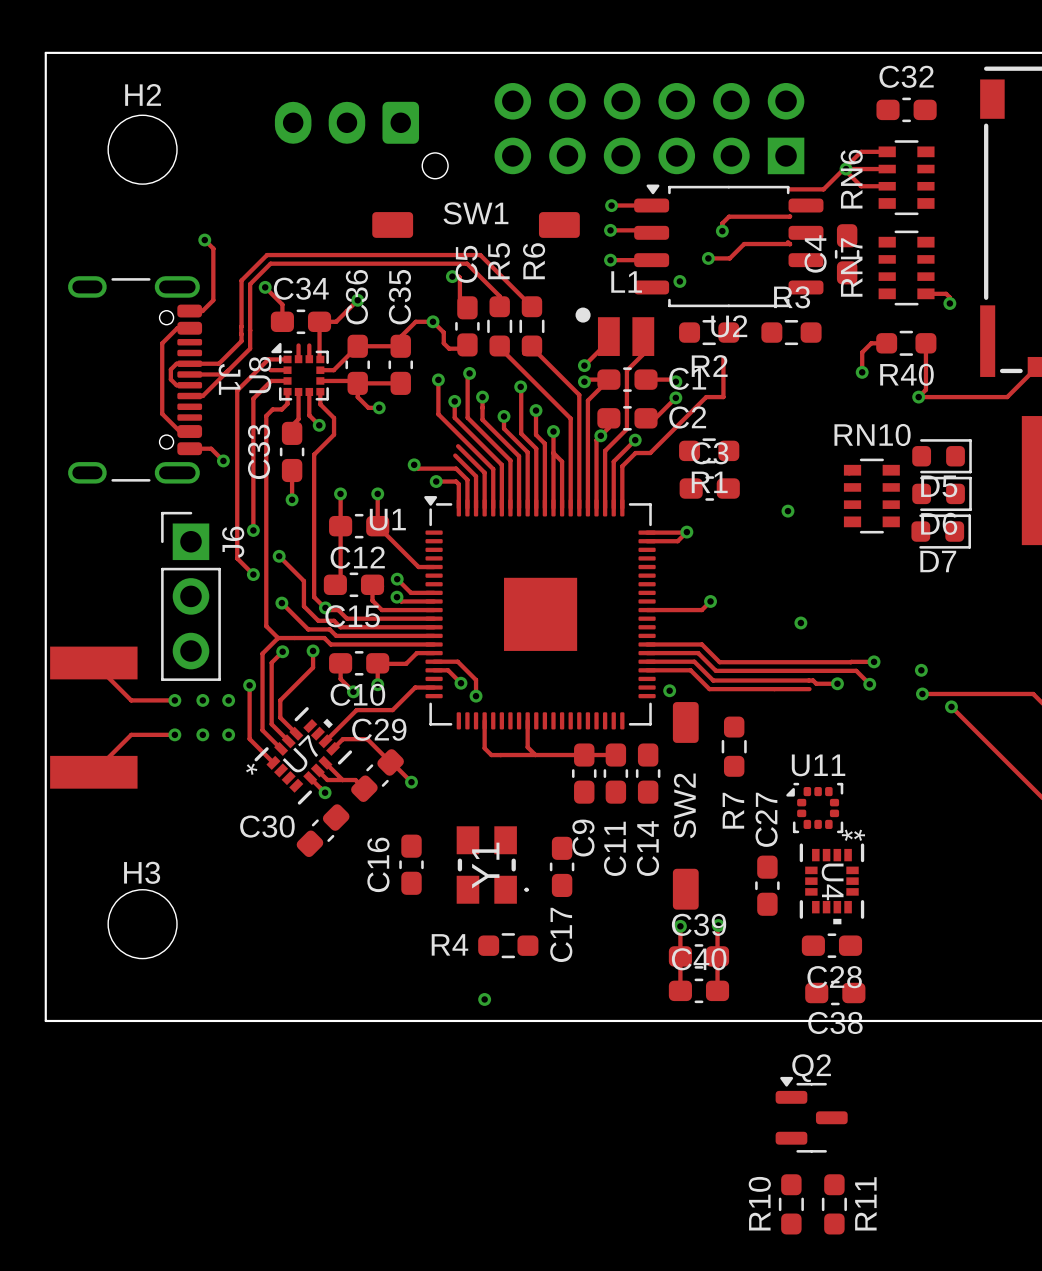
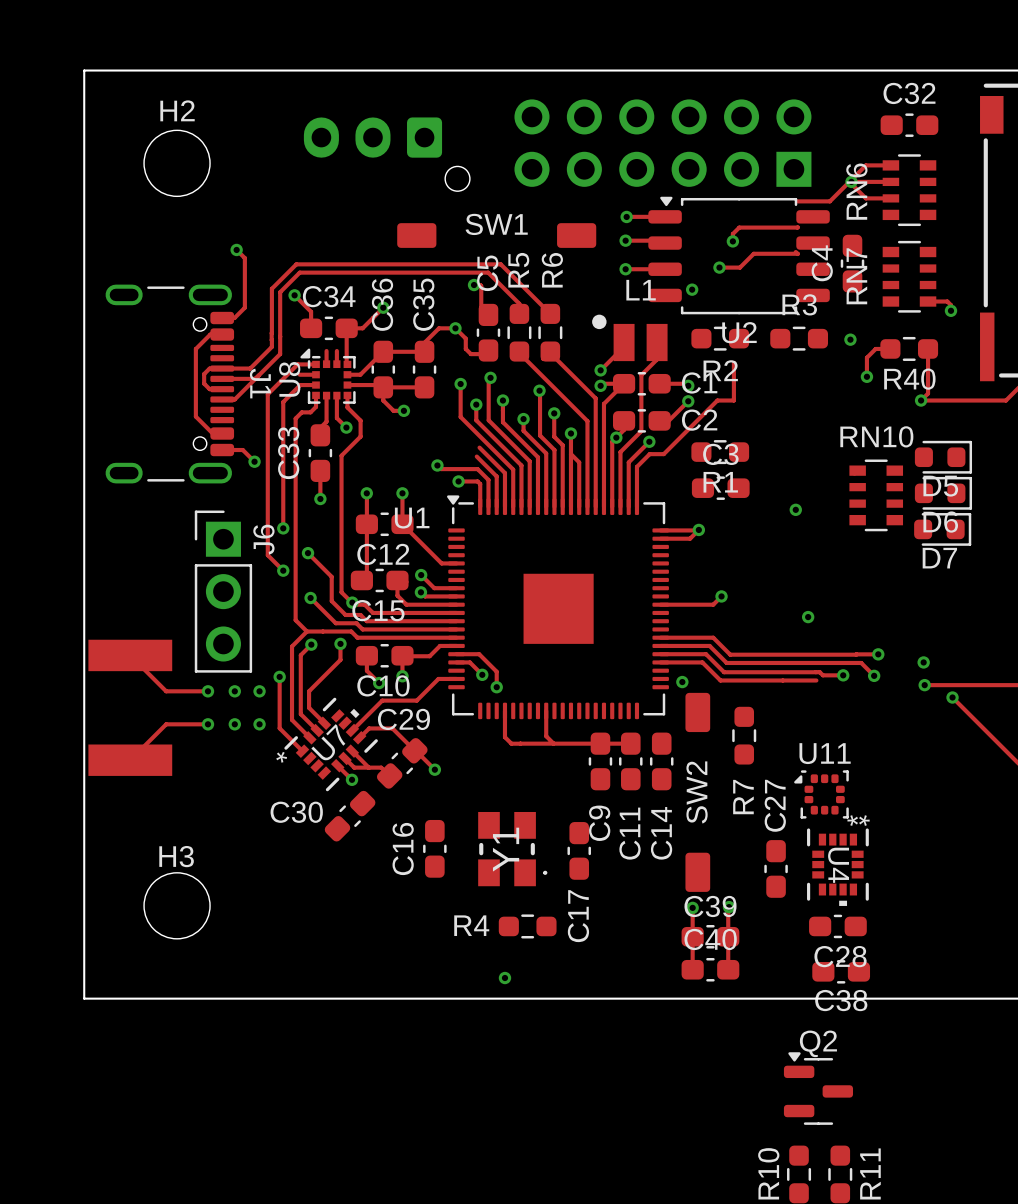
via: none -> (850, 339)

